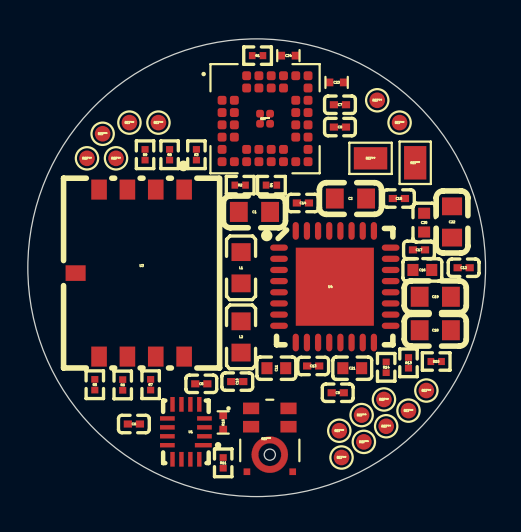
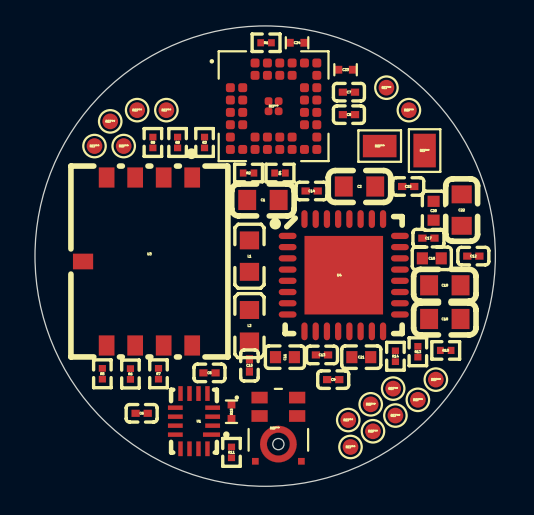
part rotation: 0° (237, 381) -> 90° clockwise (249, 365)
part position: (337, 392) -> (333, 379)

